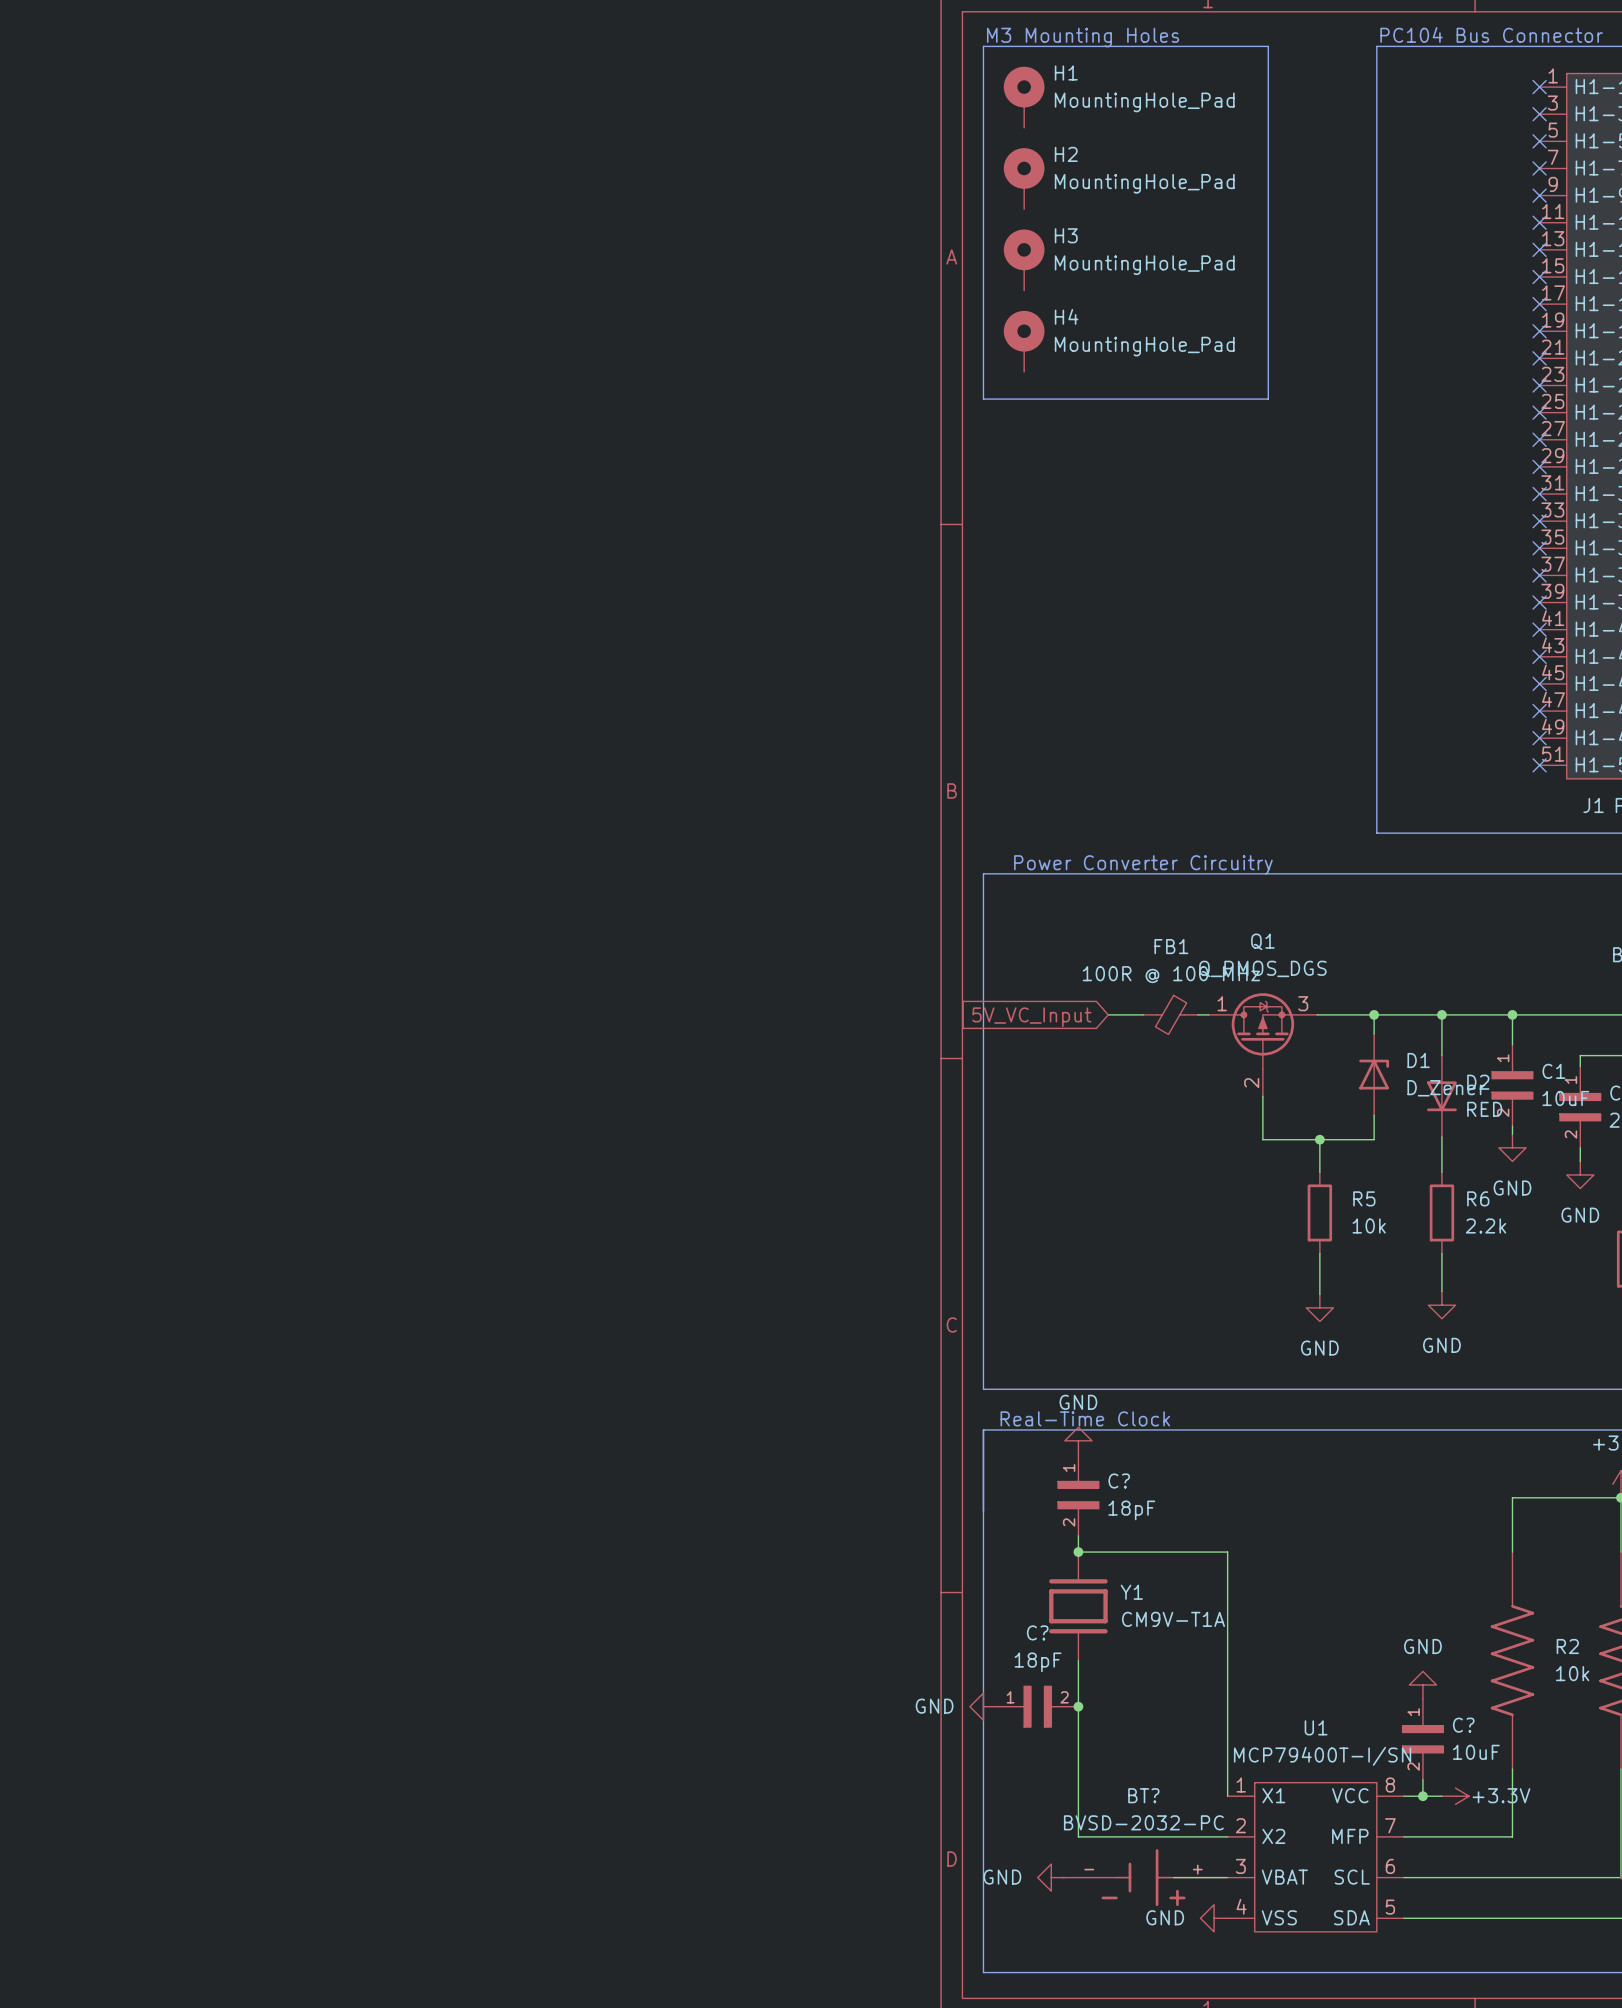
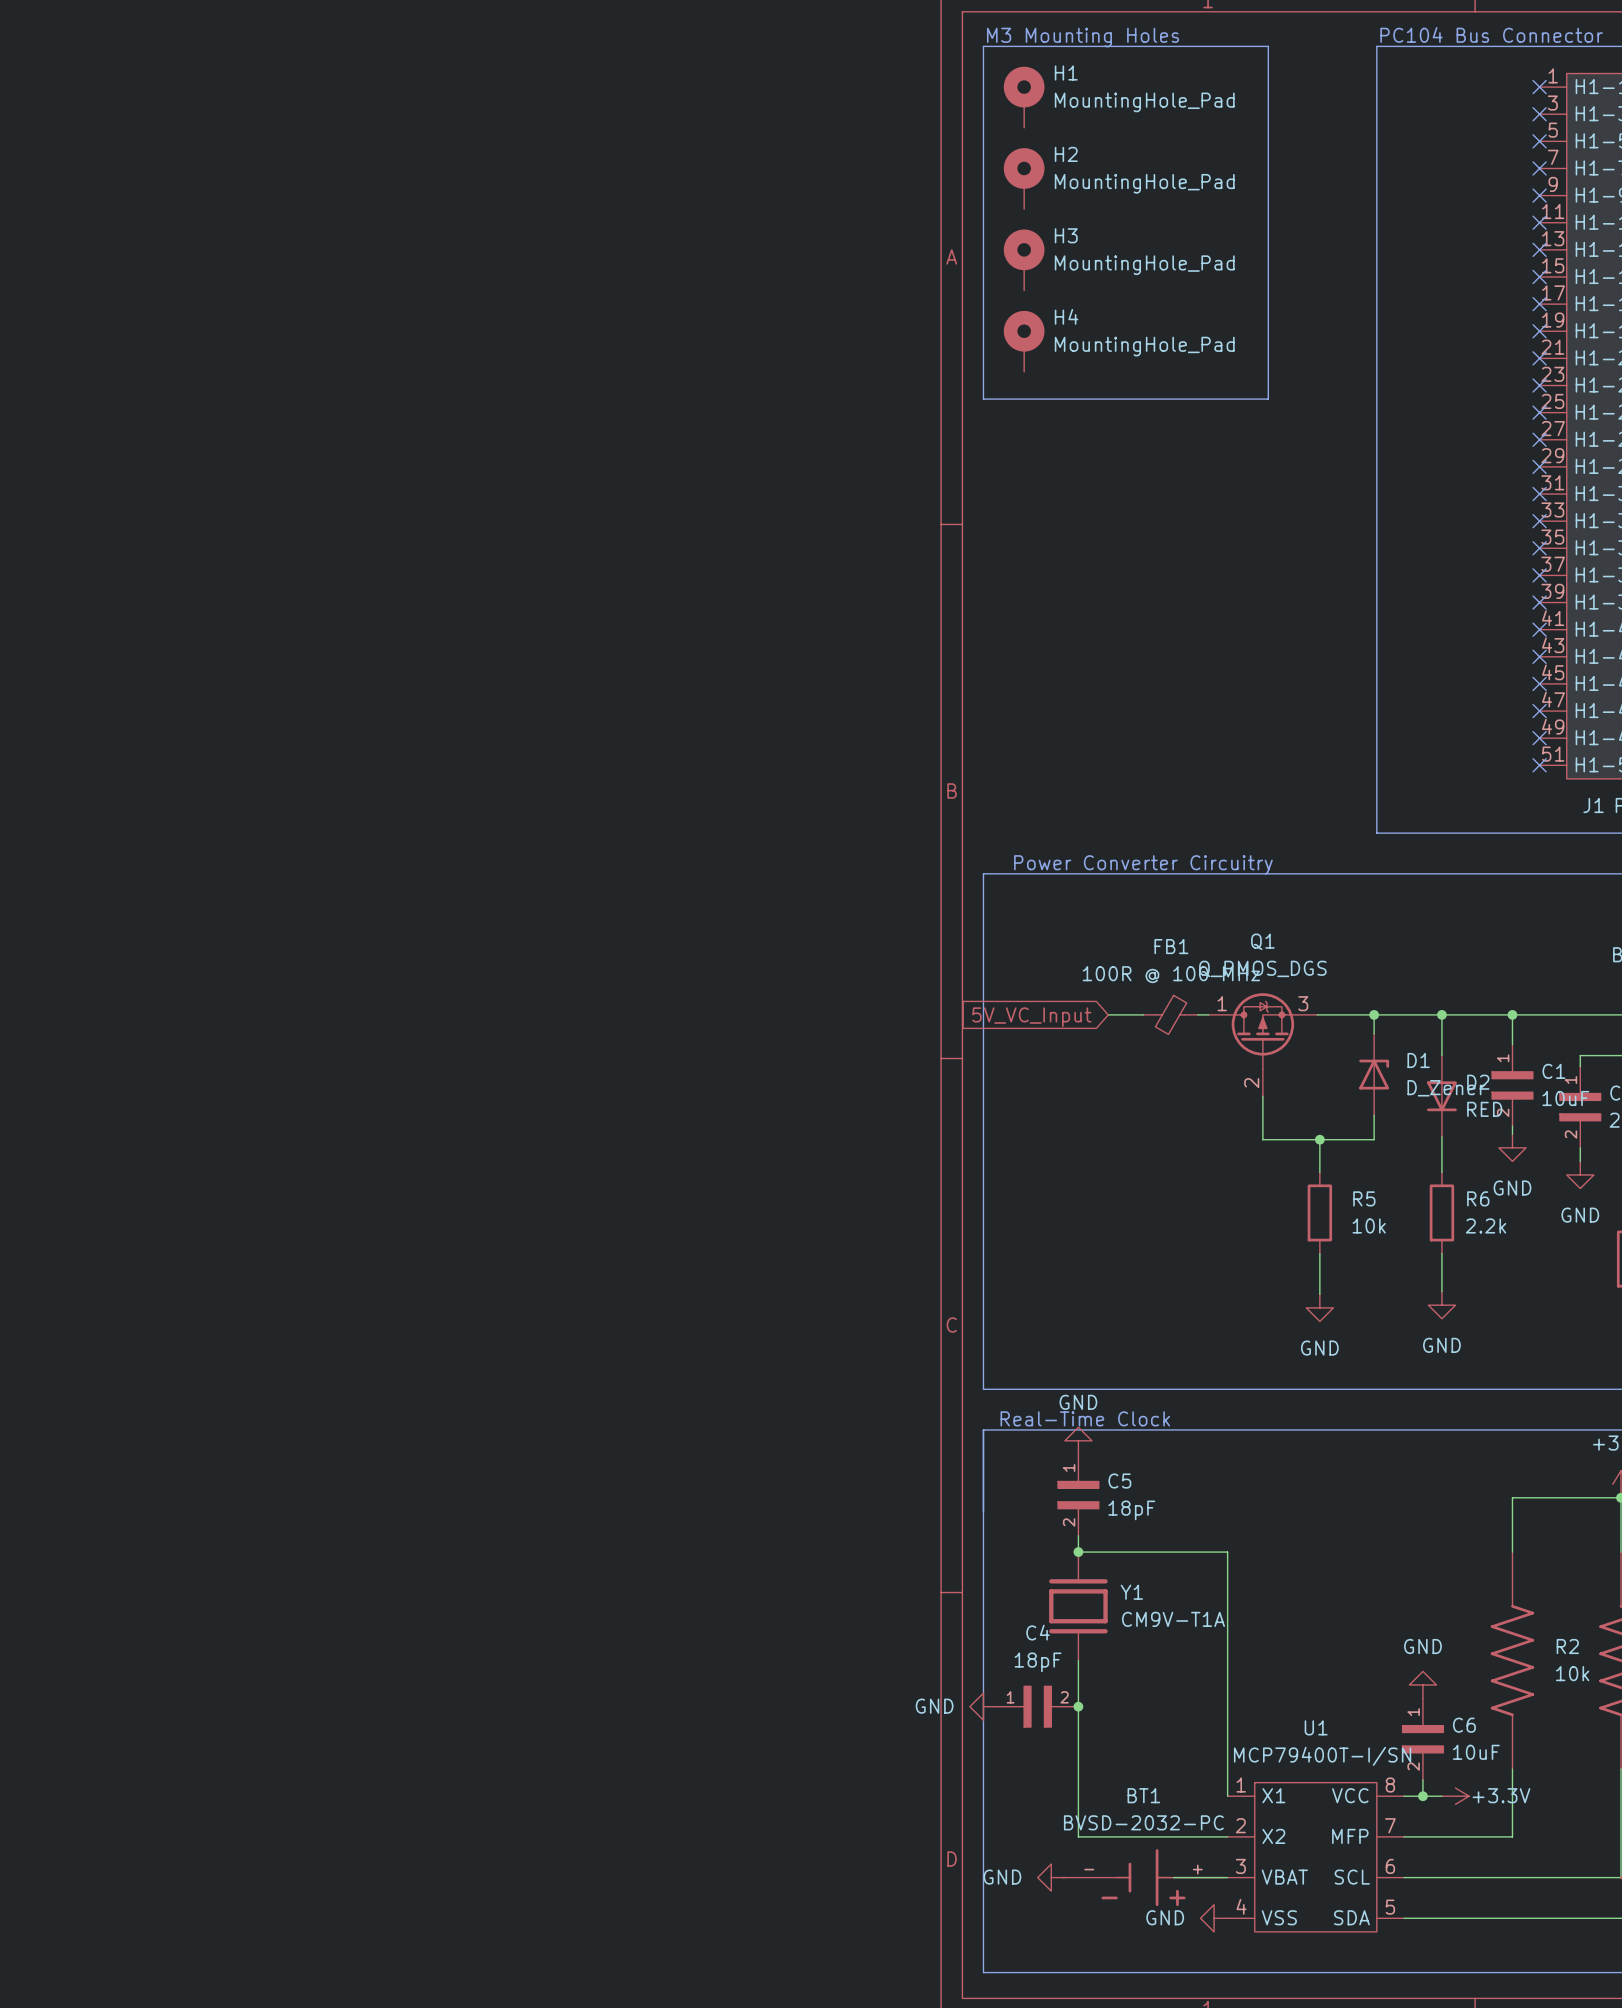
C? name: C? (1119, 1481) -> C5 (1119, 1481)
C? name: C? (1037, 1632) -> C4 (1038, 1632)
C? name: C? (1463, 1725) -> C6 (1464, 1725)
BT? name: BT? (1143, 1795) -> BT1 (1143, 1795)

